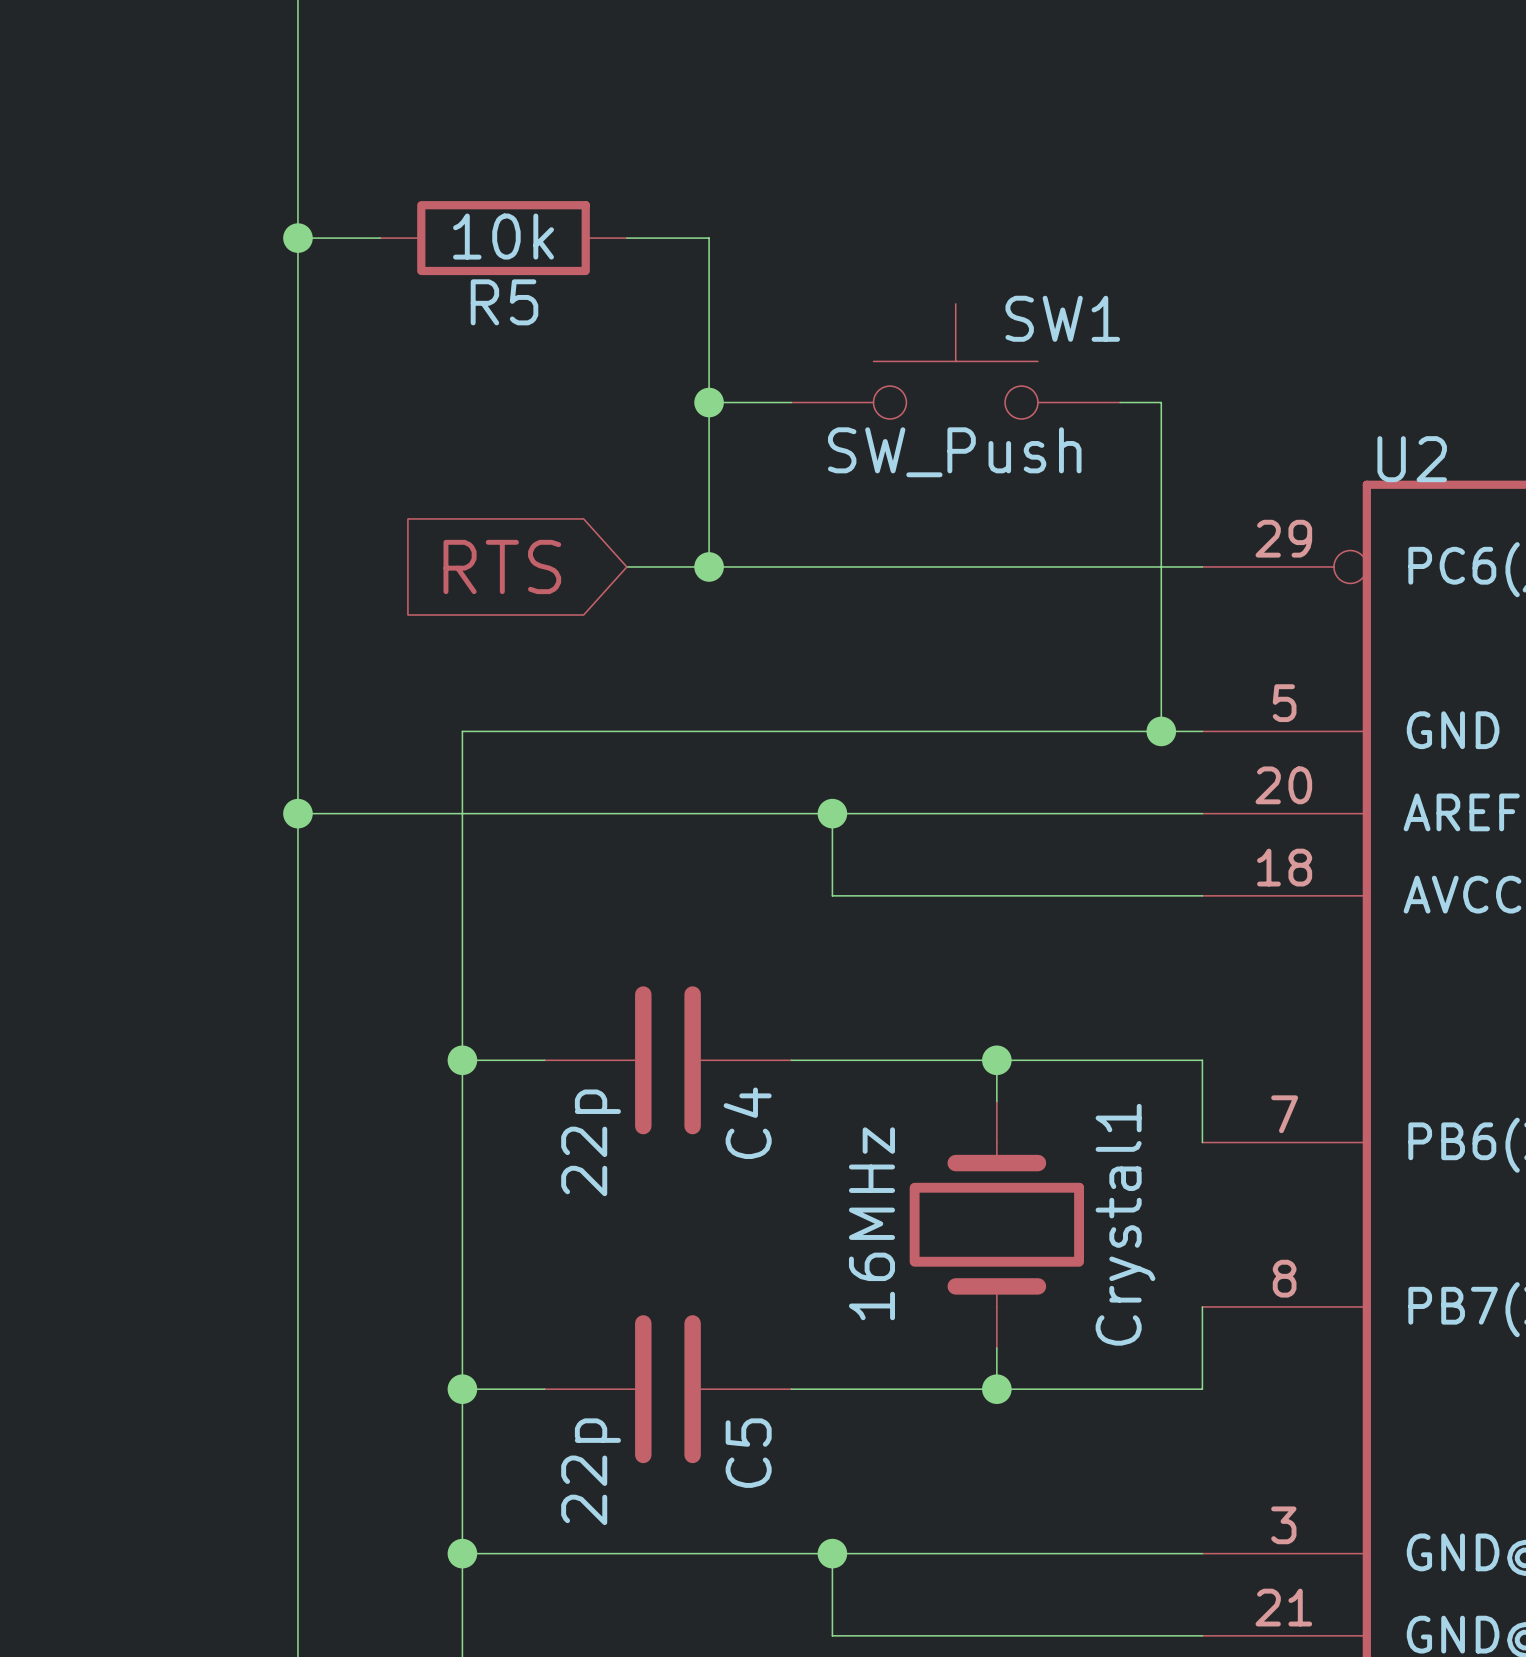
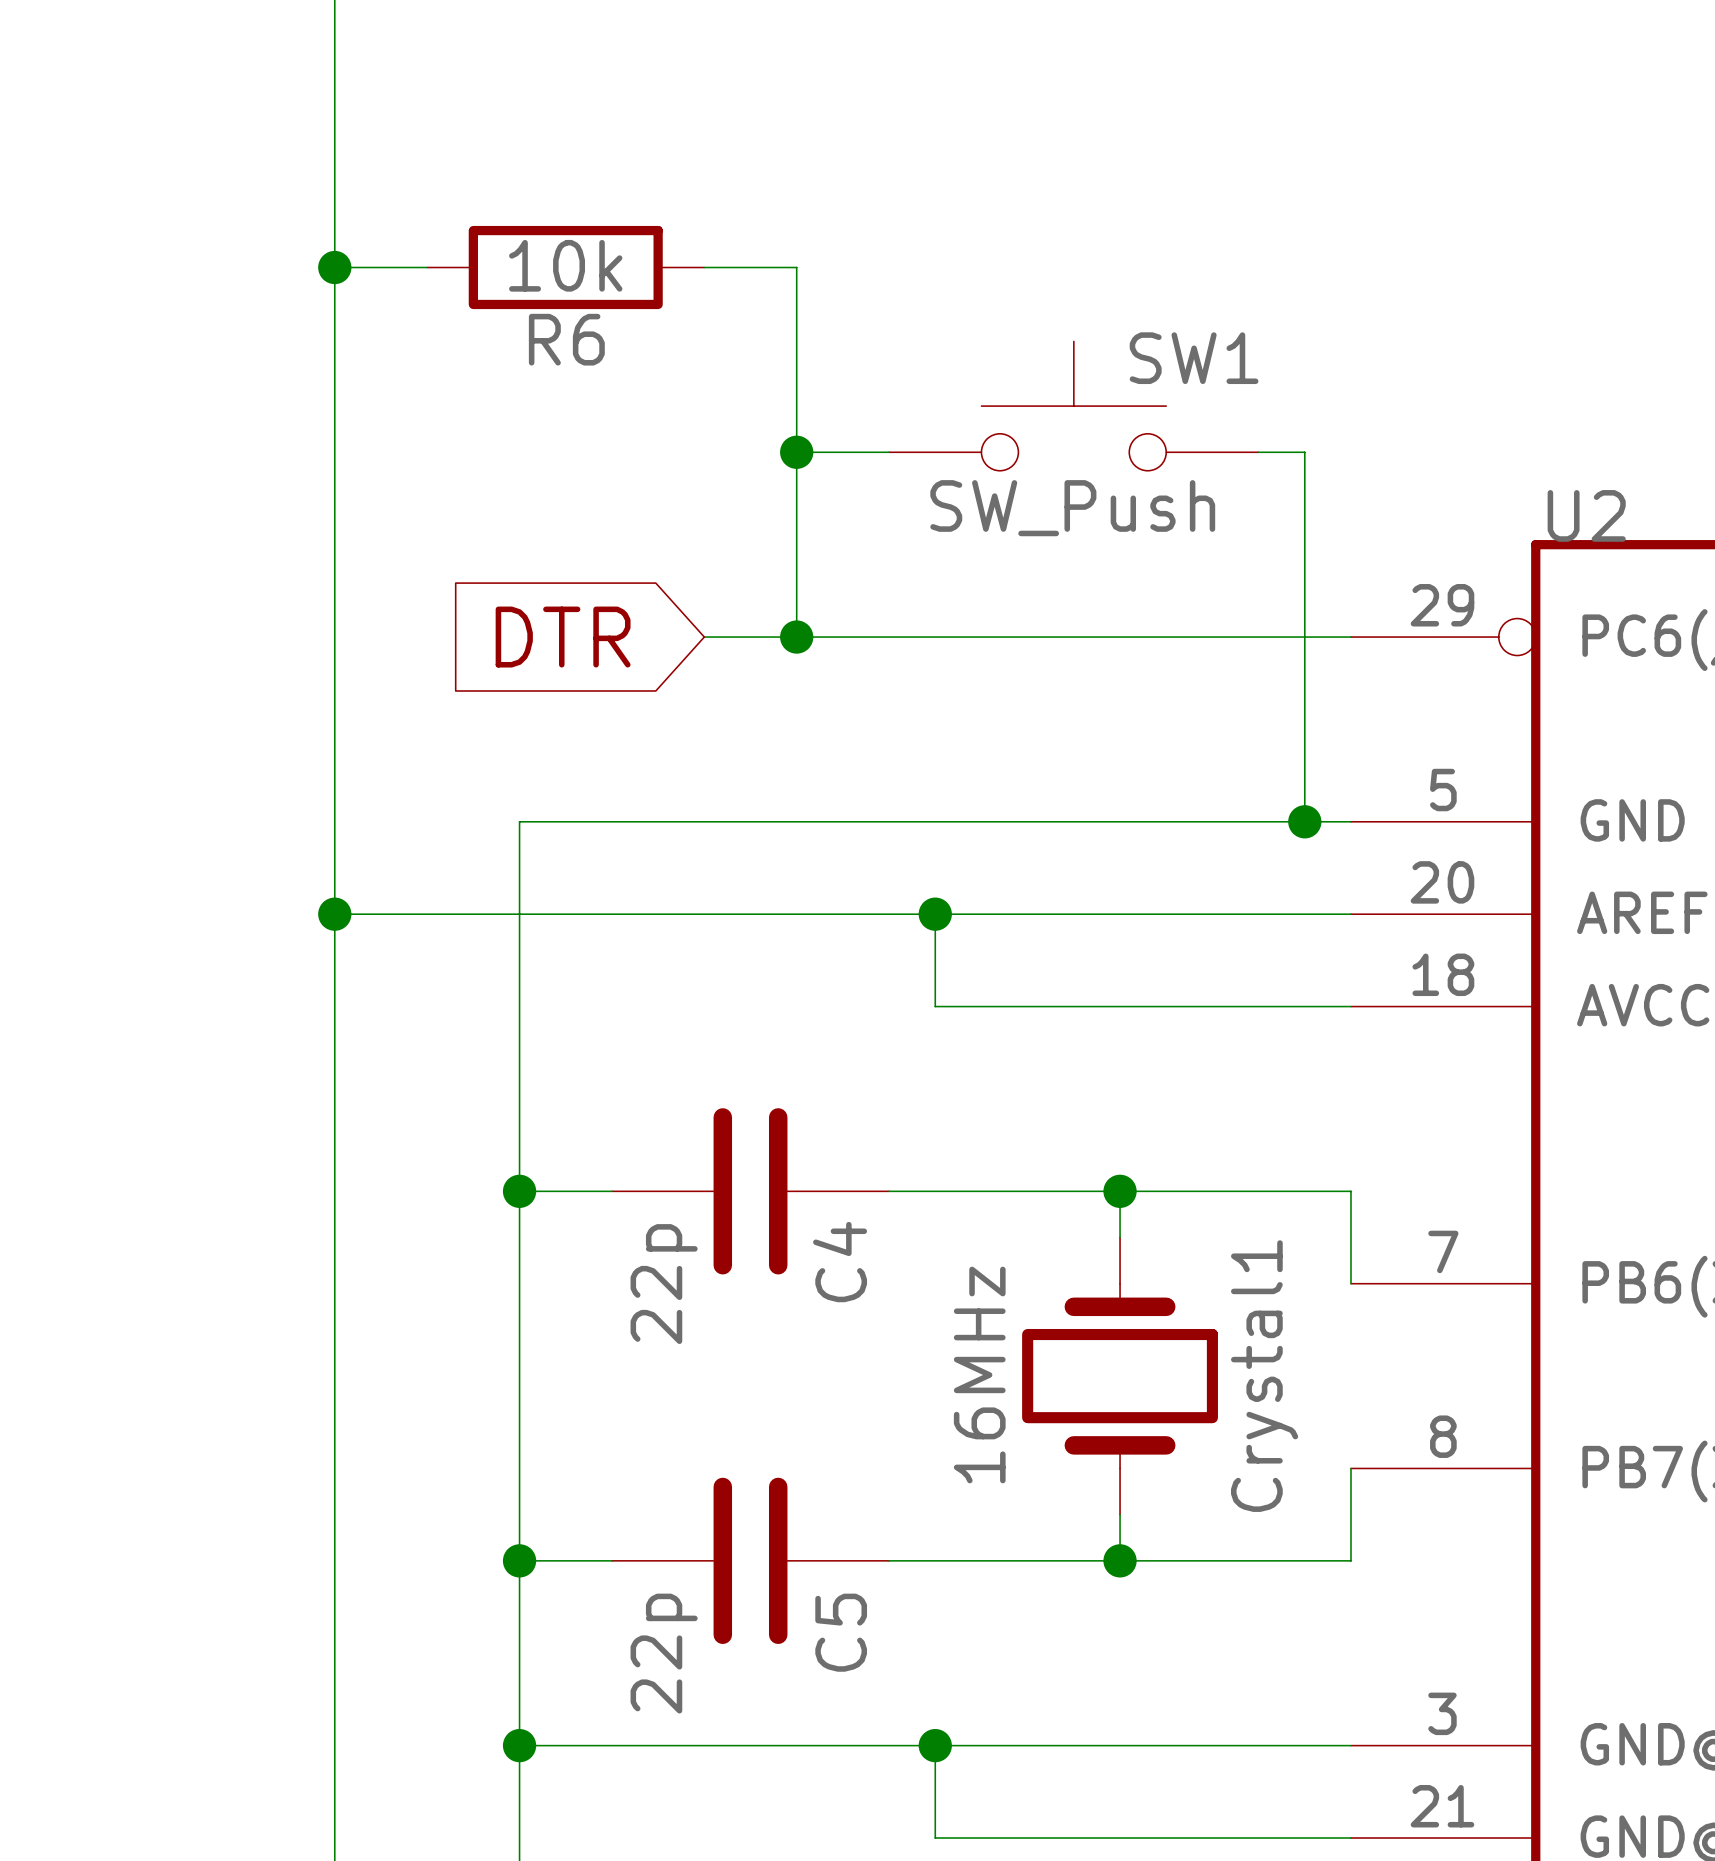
R5 name: R5 (504, 302) -> R6 (566, 339)
global label: RTS (502, 566) -> DTR (563, 637)

